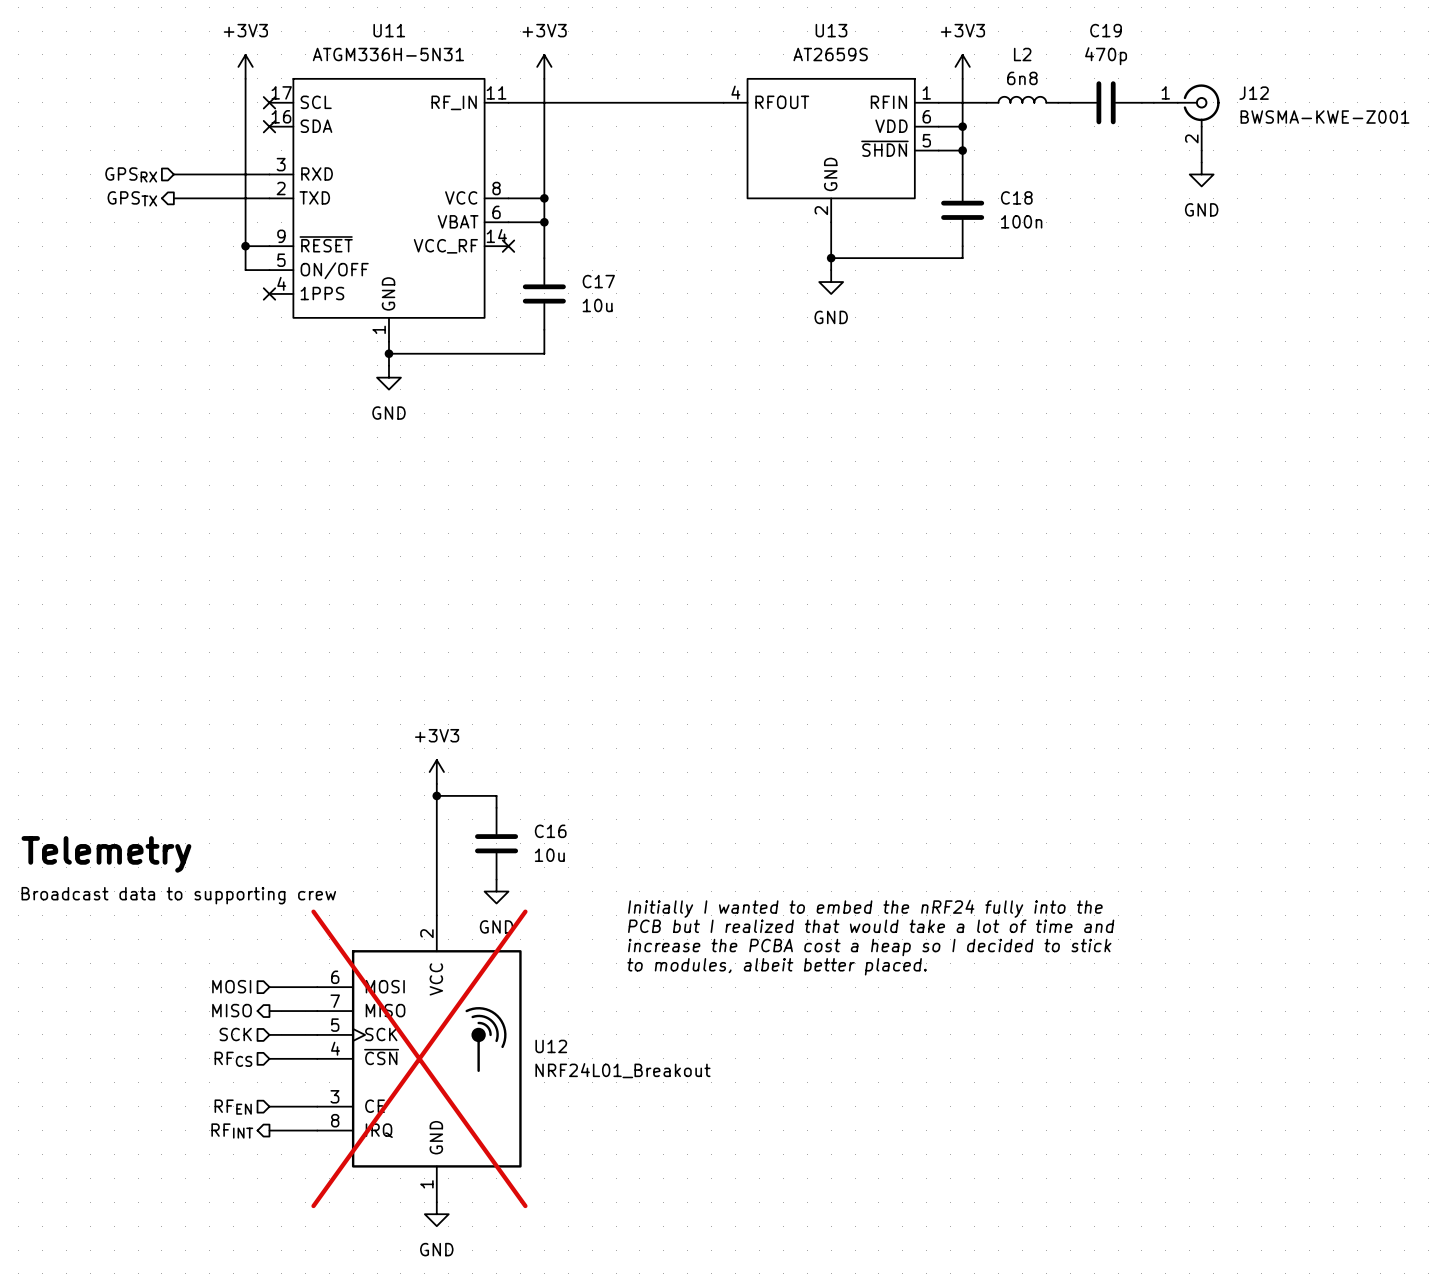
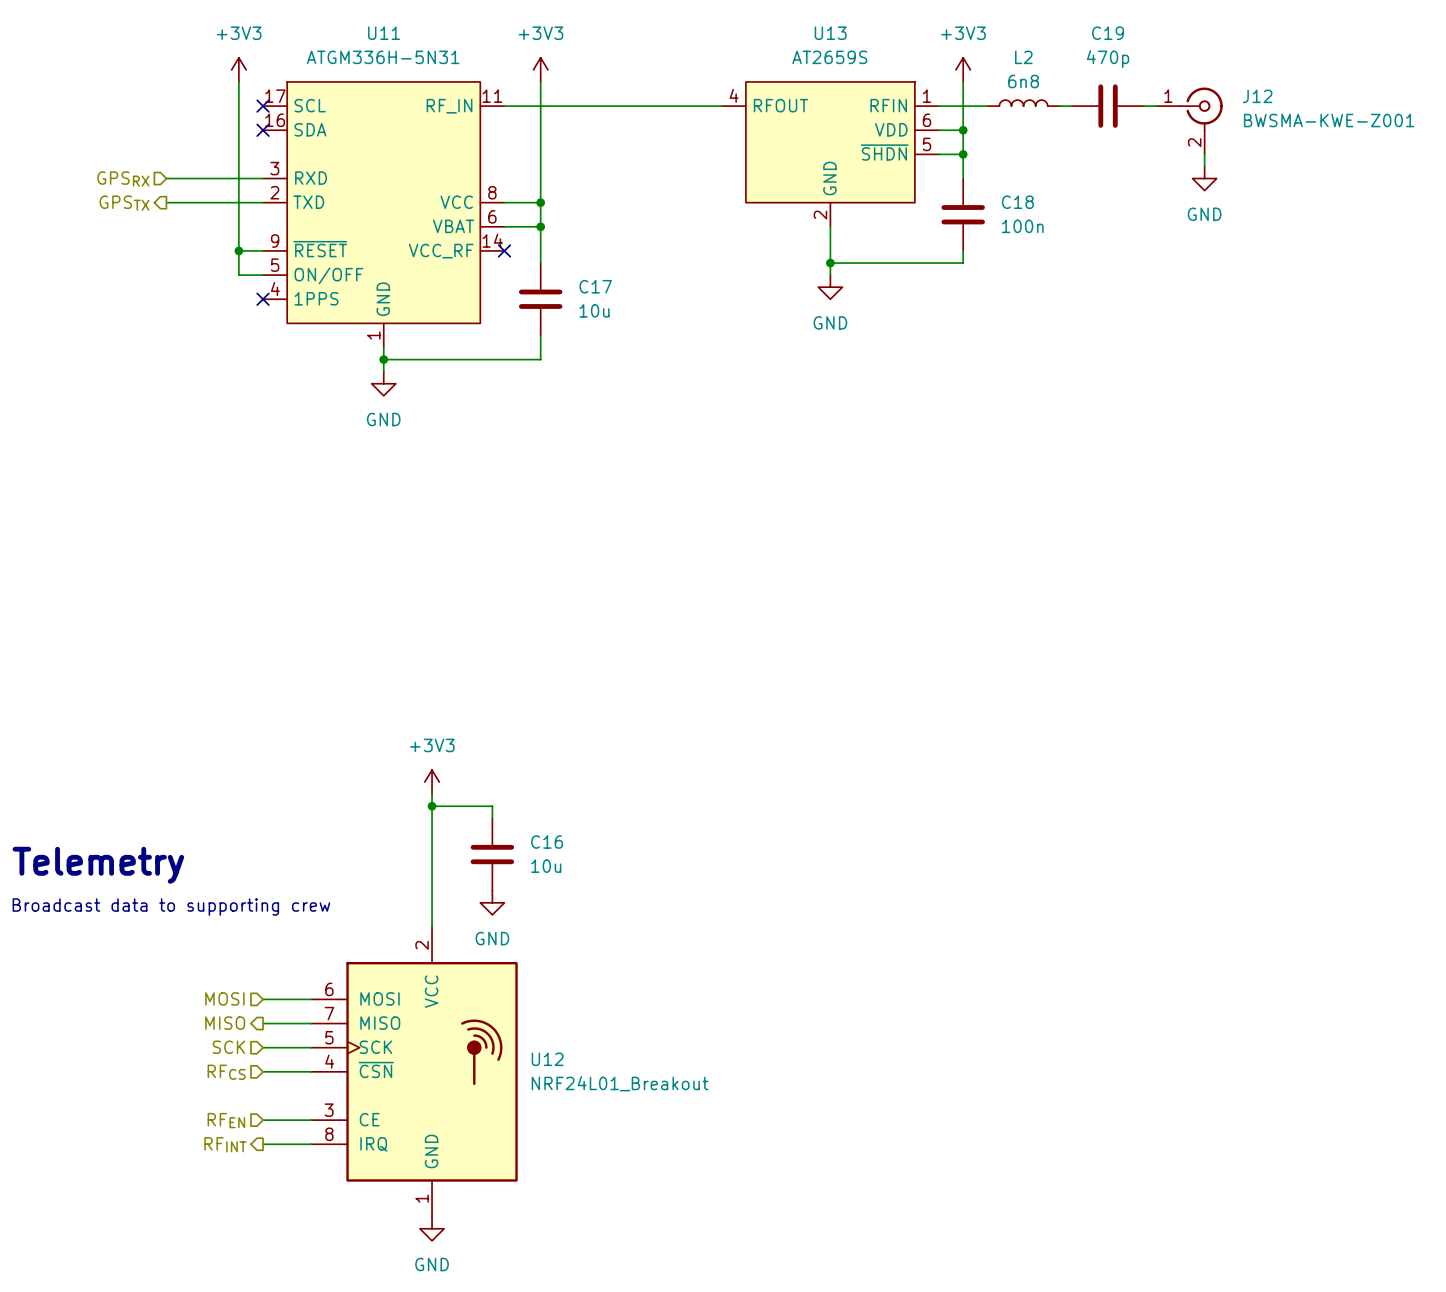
text: Initially I wanted to embed the nRF24 fully into the (865, 908) -> none
text: PCB but I realized that would take a lot of time and (871, 926) -> none
text: increase the PCBA cost a heap so I decided to stick (869, 947) -> none
text: to modules, albeit better placed. (777, 966) -> none
U12 do-not-place cross: (419, 1058) -> none

